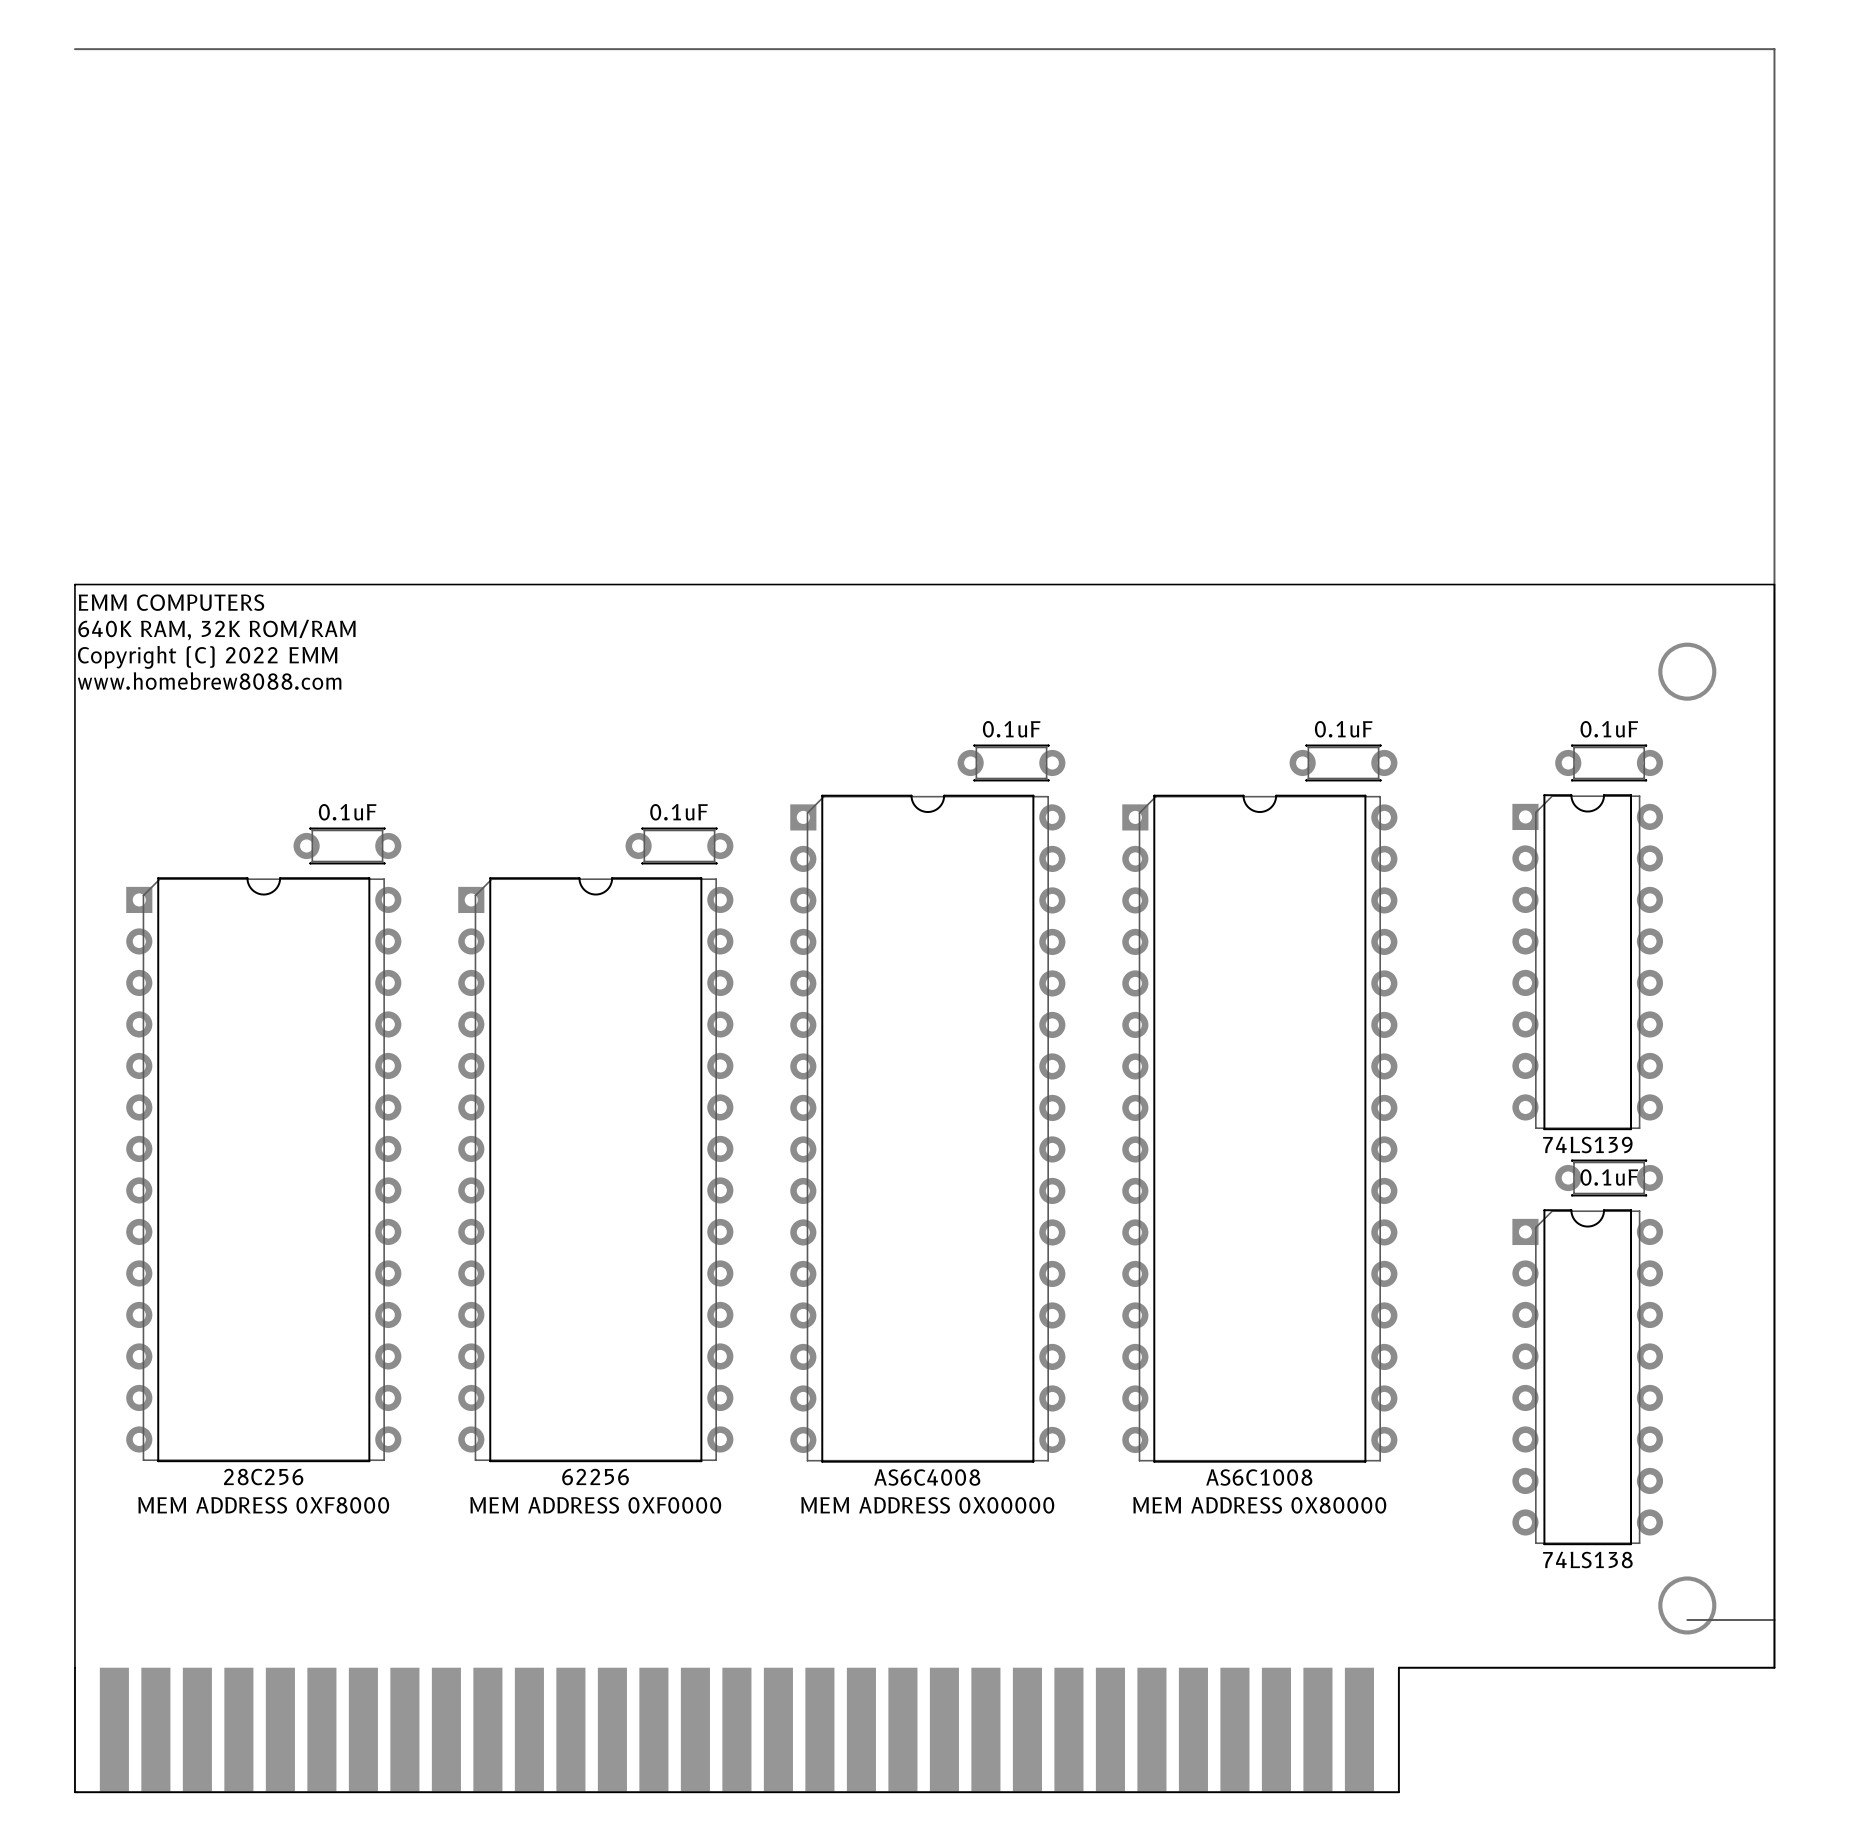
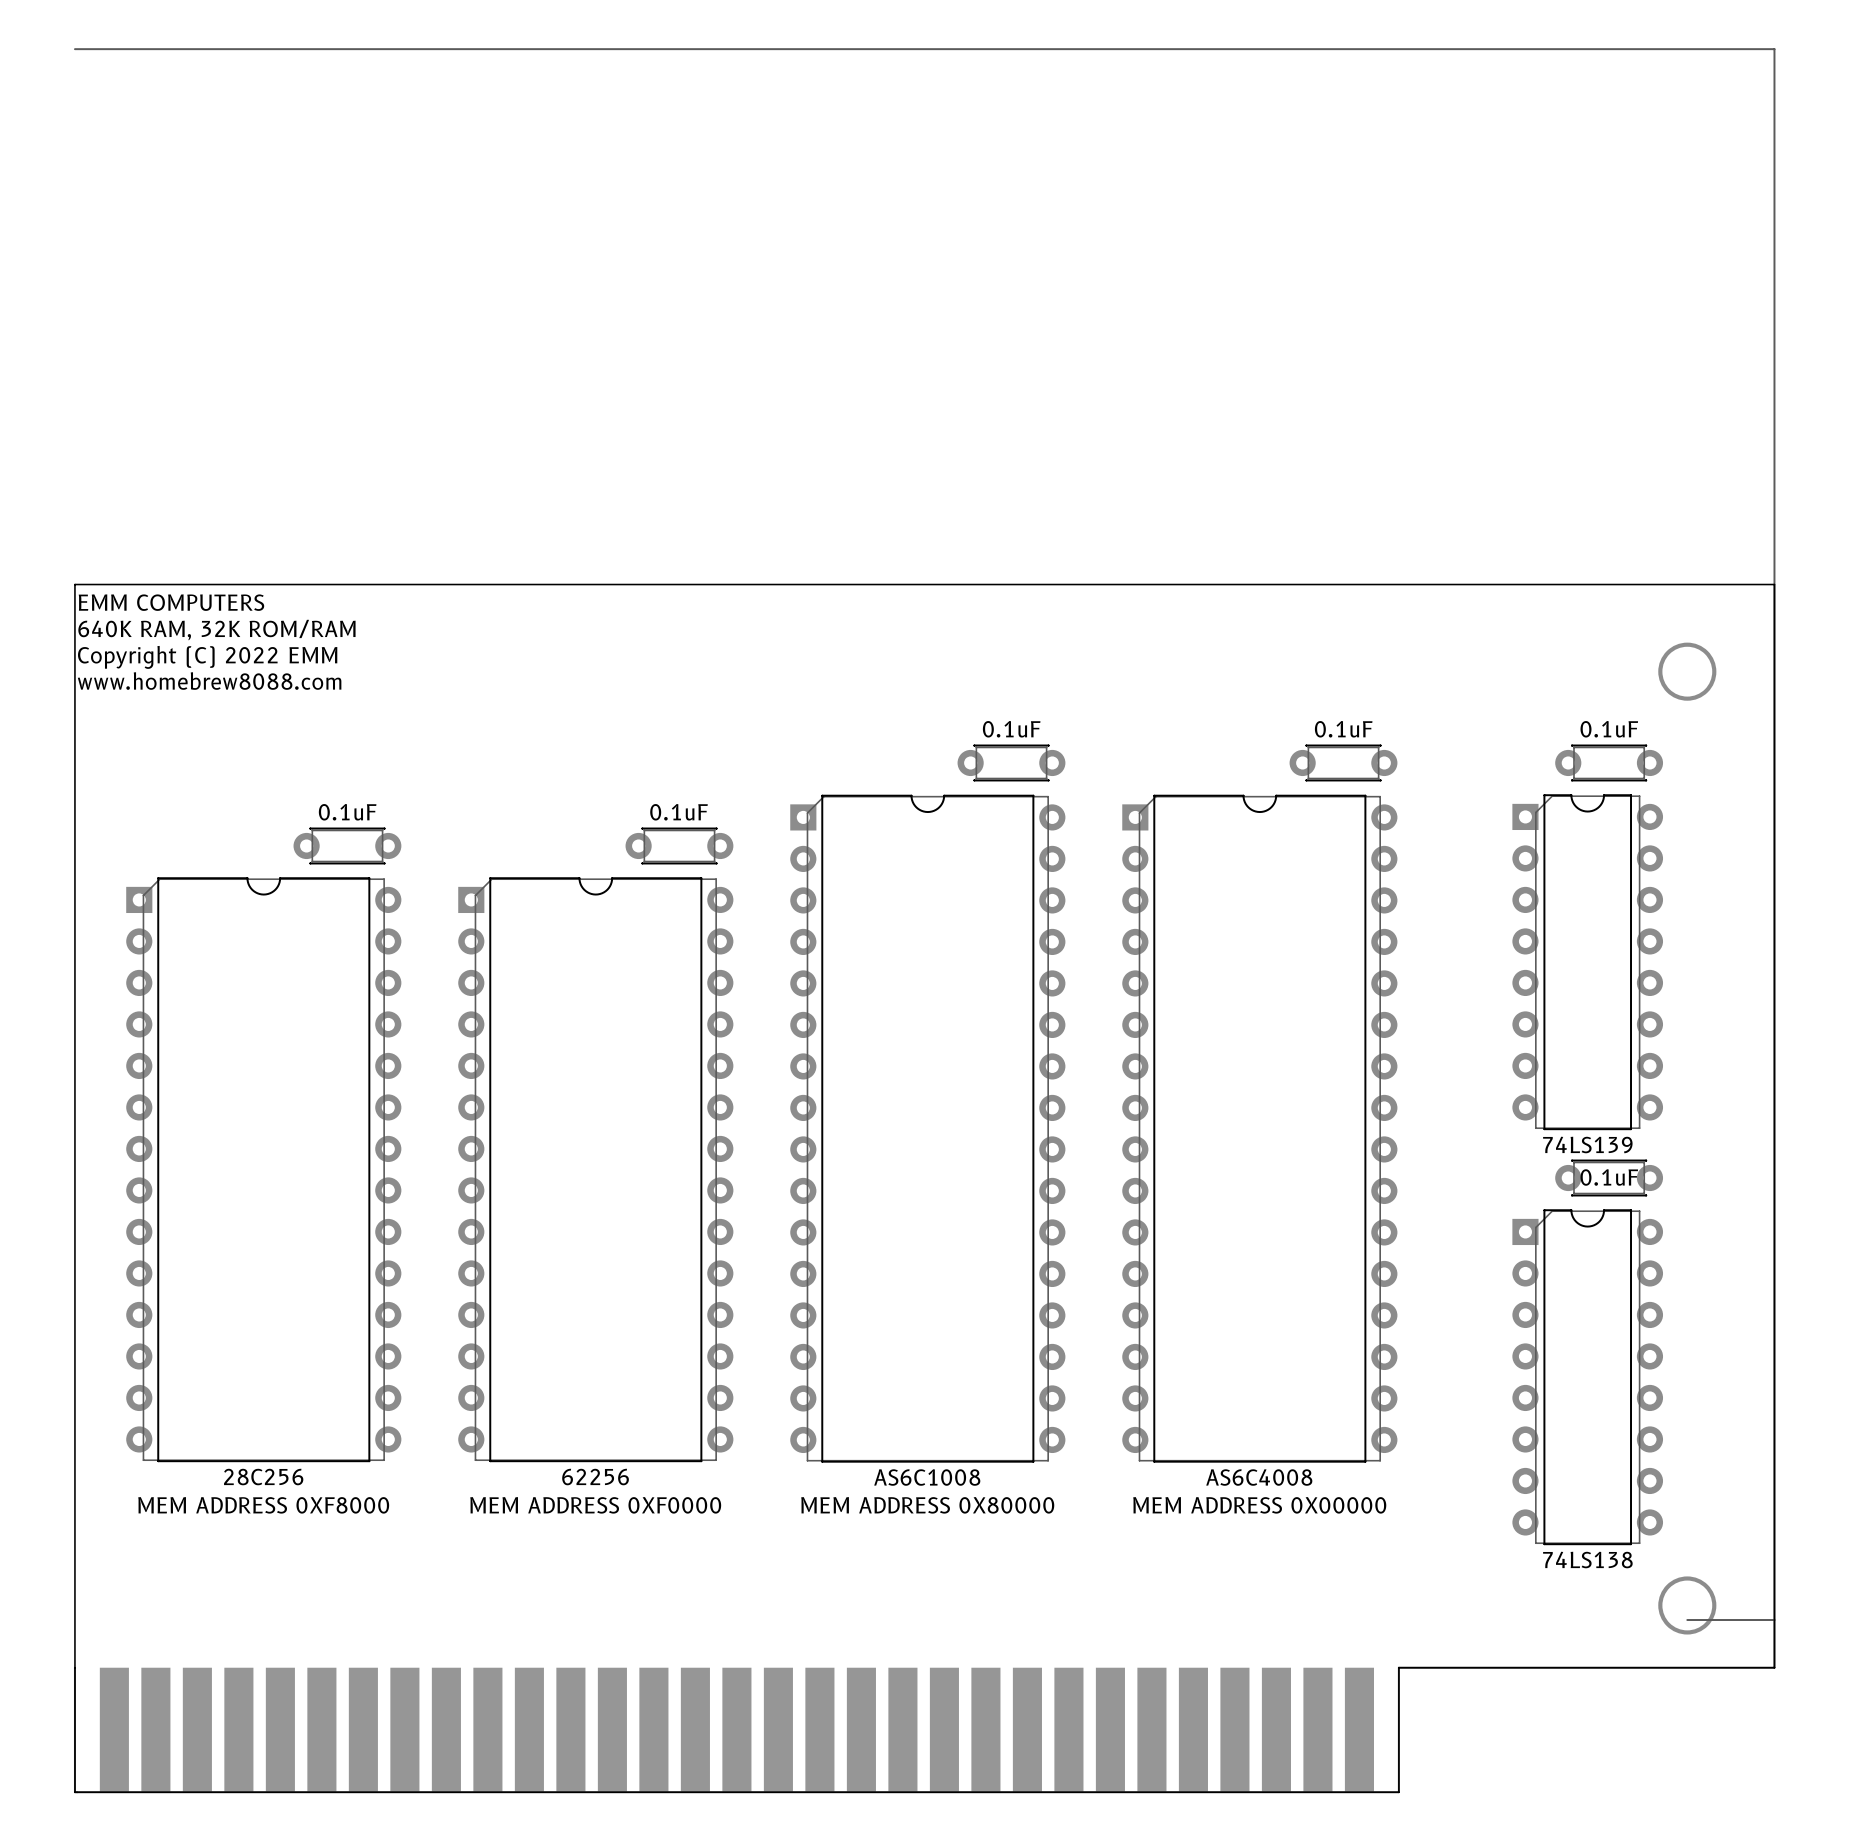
part value: AS6C4008 (927, 1477) -> AS6C1008 (927, 1477)
part value: AS6C1008 (1259, 1477) -> AS6C4008 (1259, 1477)
text: MEM ADDRESS 0X00000 (927, 1505) -> MEM ADDRESS 0X80000 (927, 1505)
text: MEM ADDRESS 0X80000 (1259, 1505) -> MEM ADDRESS 0X00000 (1259, 1505)

